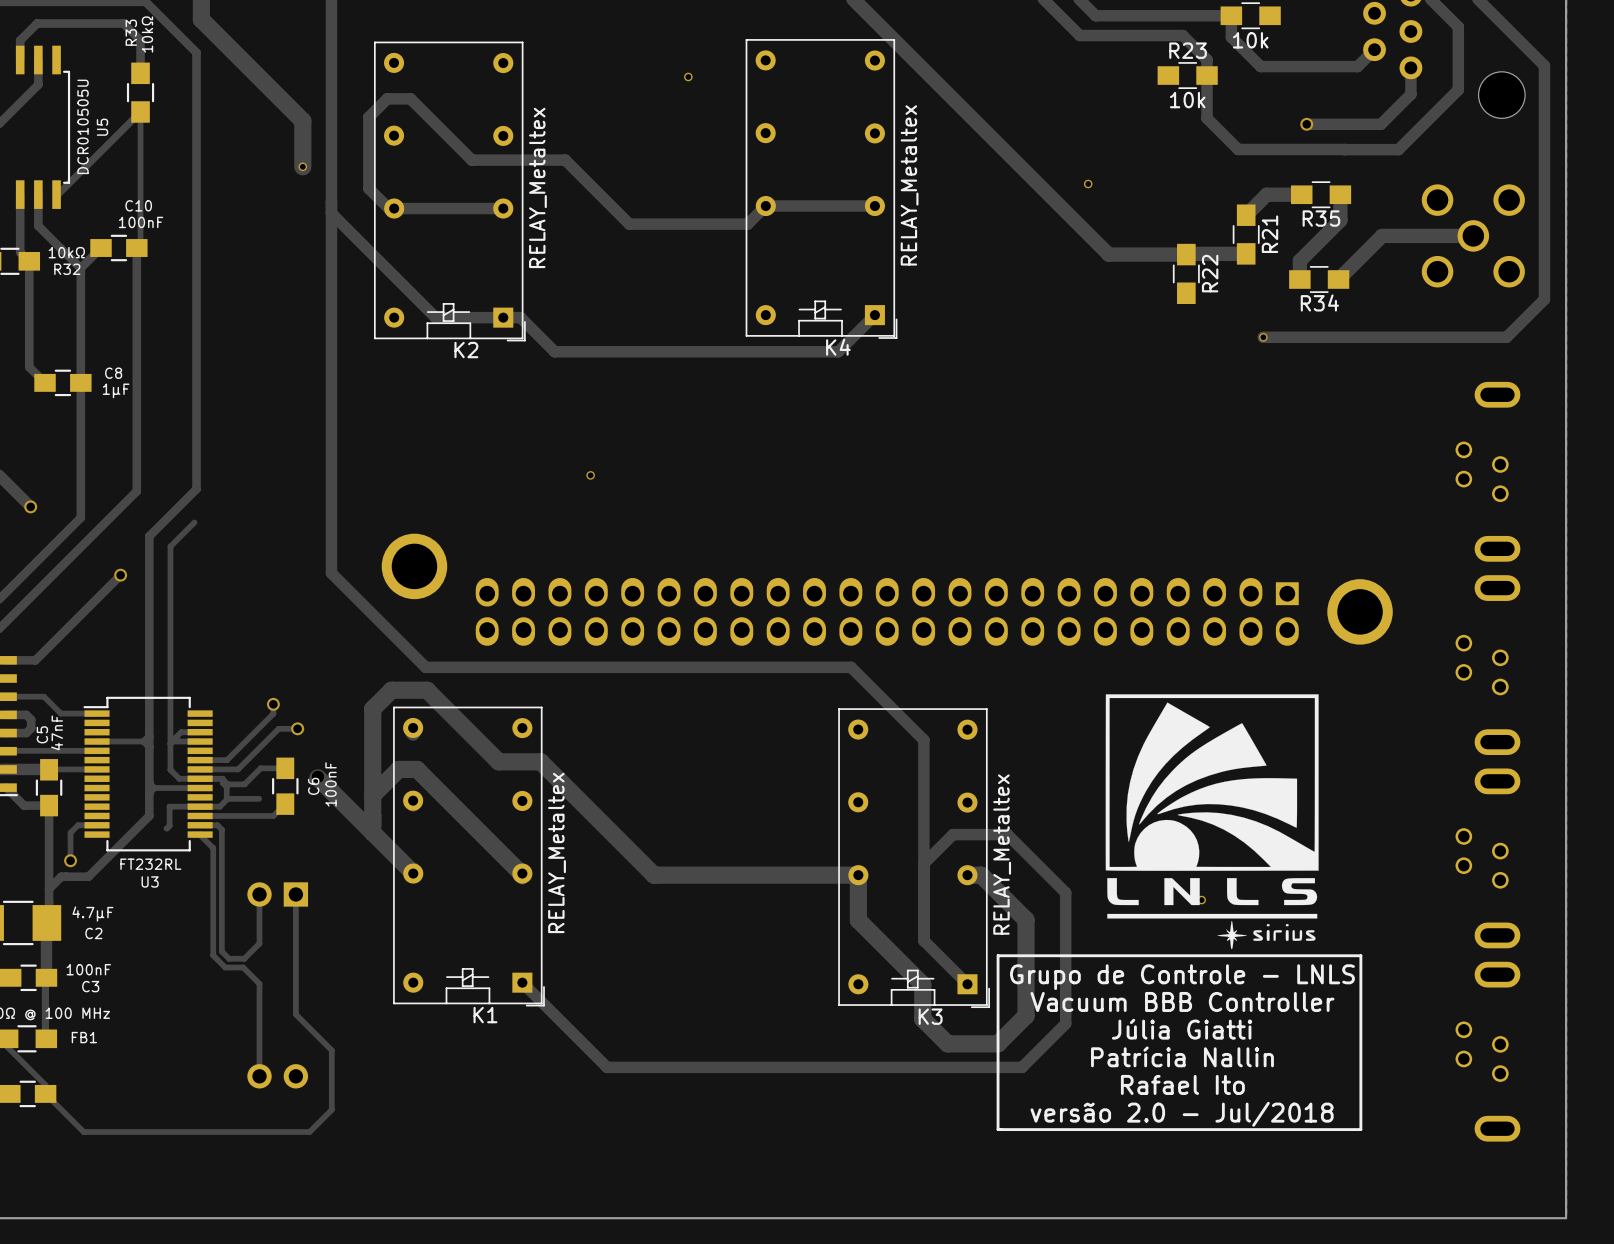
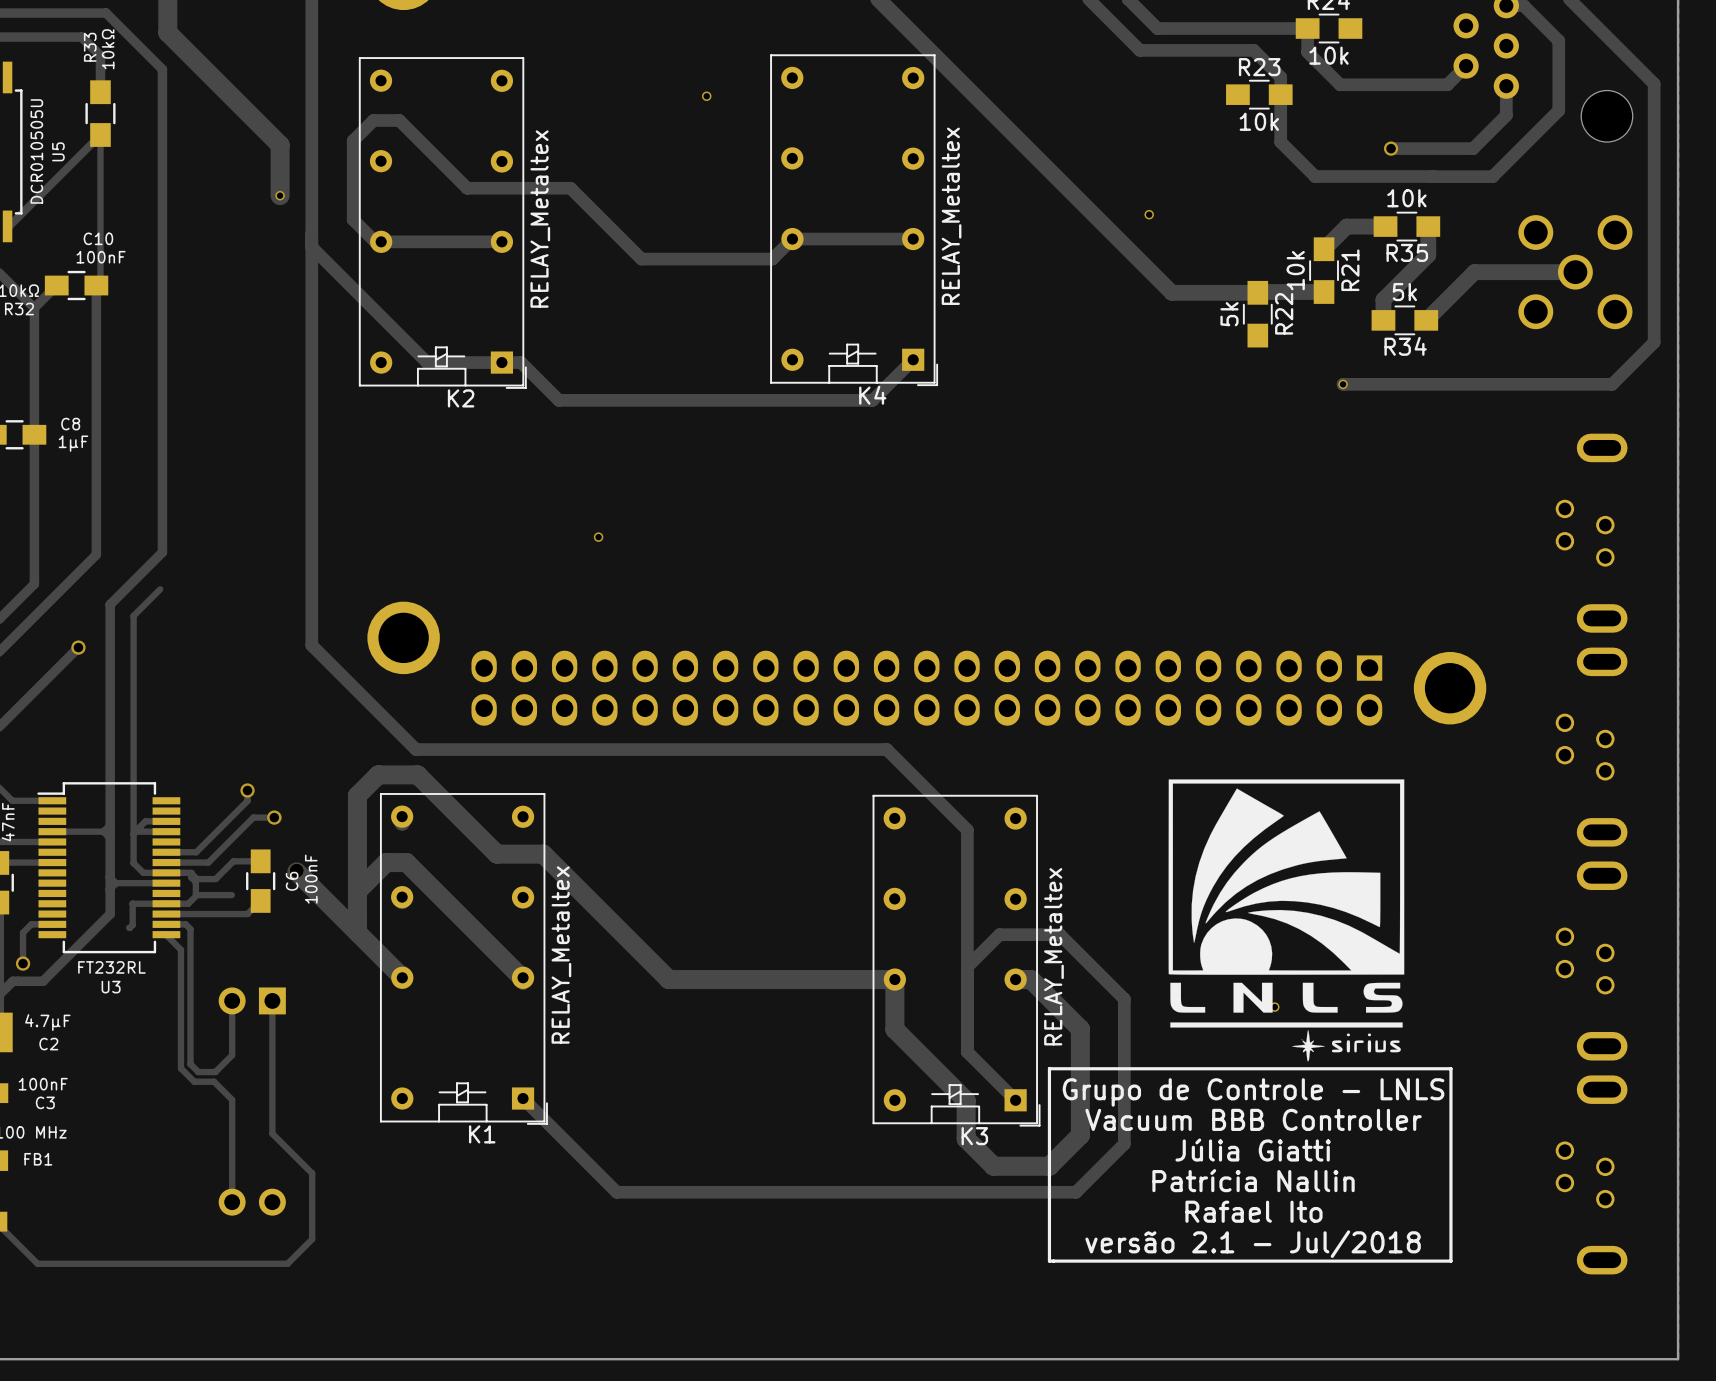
R35 value: none -> 10k (1406, 198)
R21 value: none -> 10k (1295, 270)
R34 value: none -> 5k (1404, 292)
R22 value: none -> 5k (1229, 314)
text: versão 2.0 - Jul/2018 (1182, 1114) -> versão 2.1 - Jul/2018 (1253, 1244)

